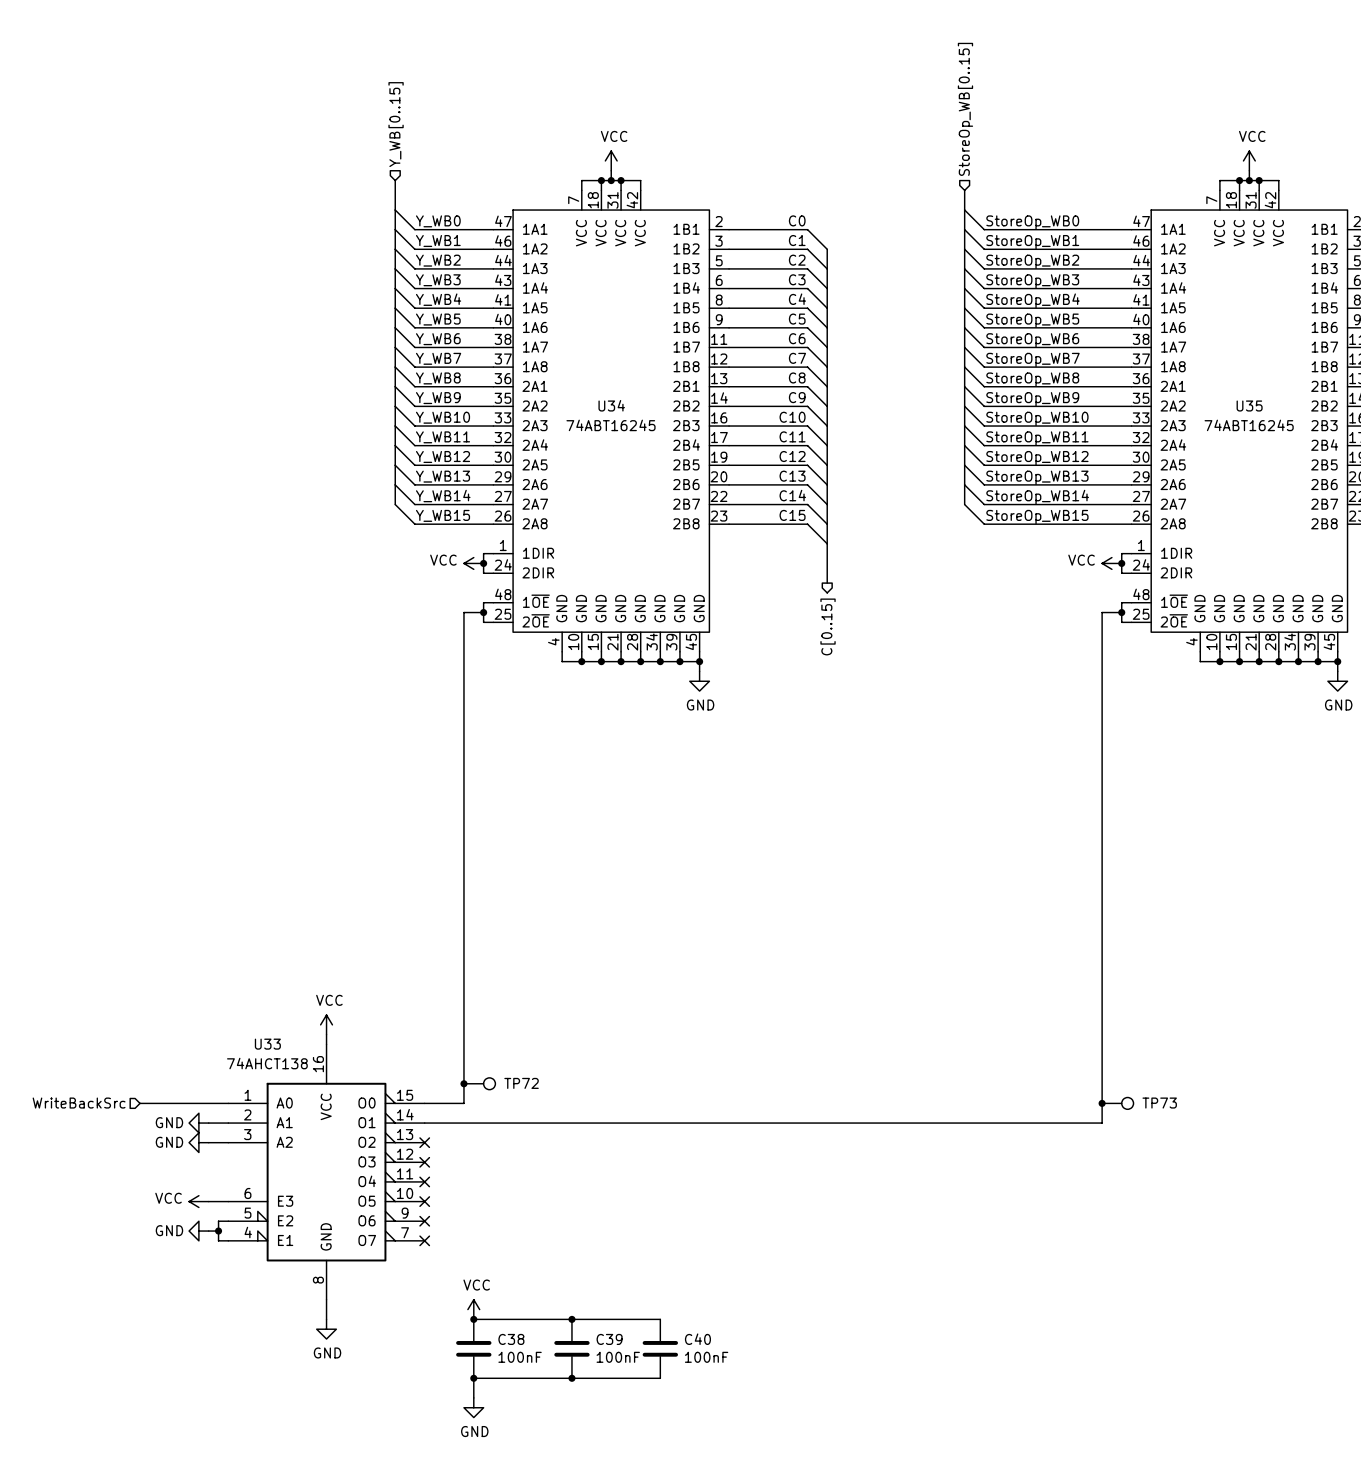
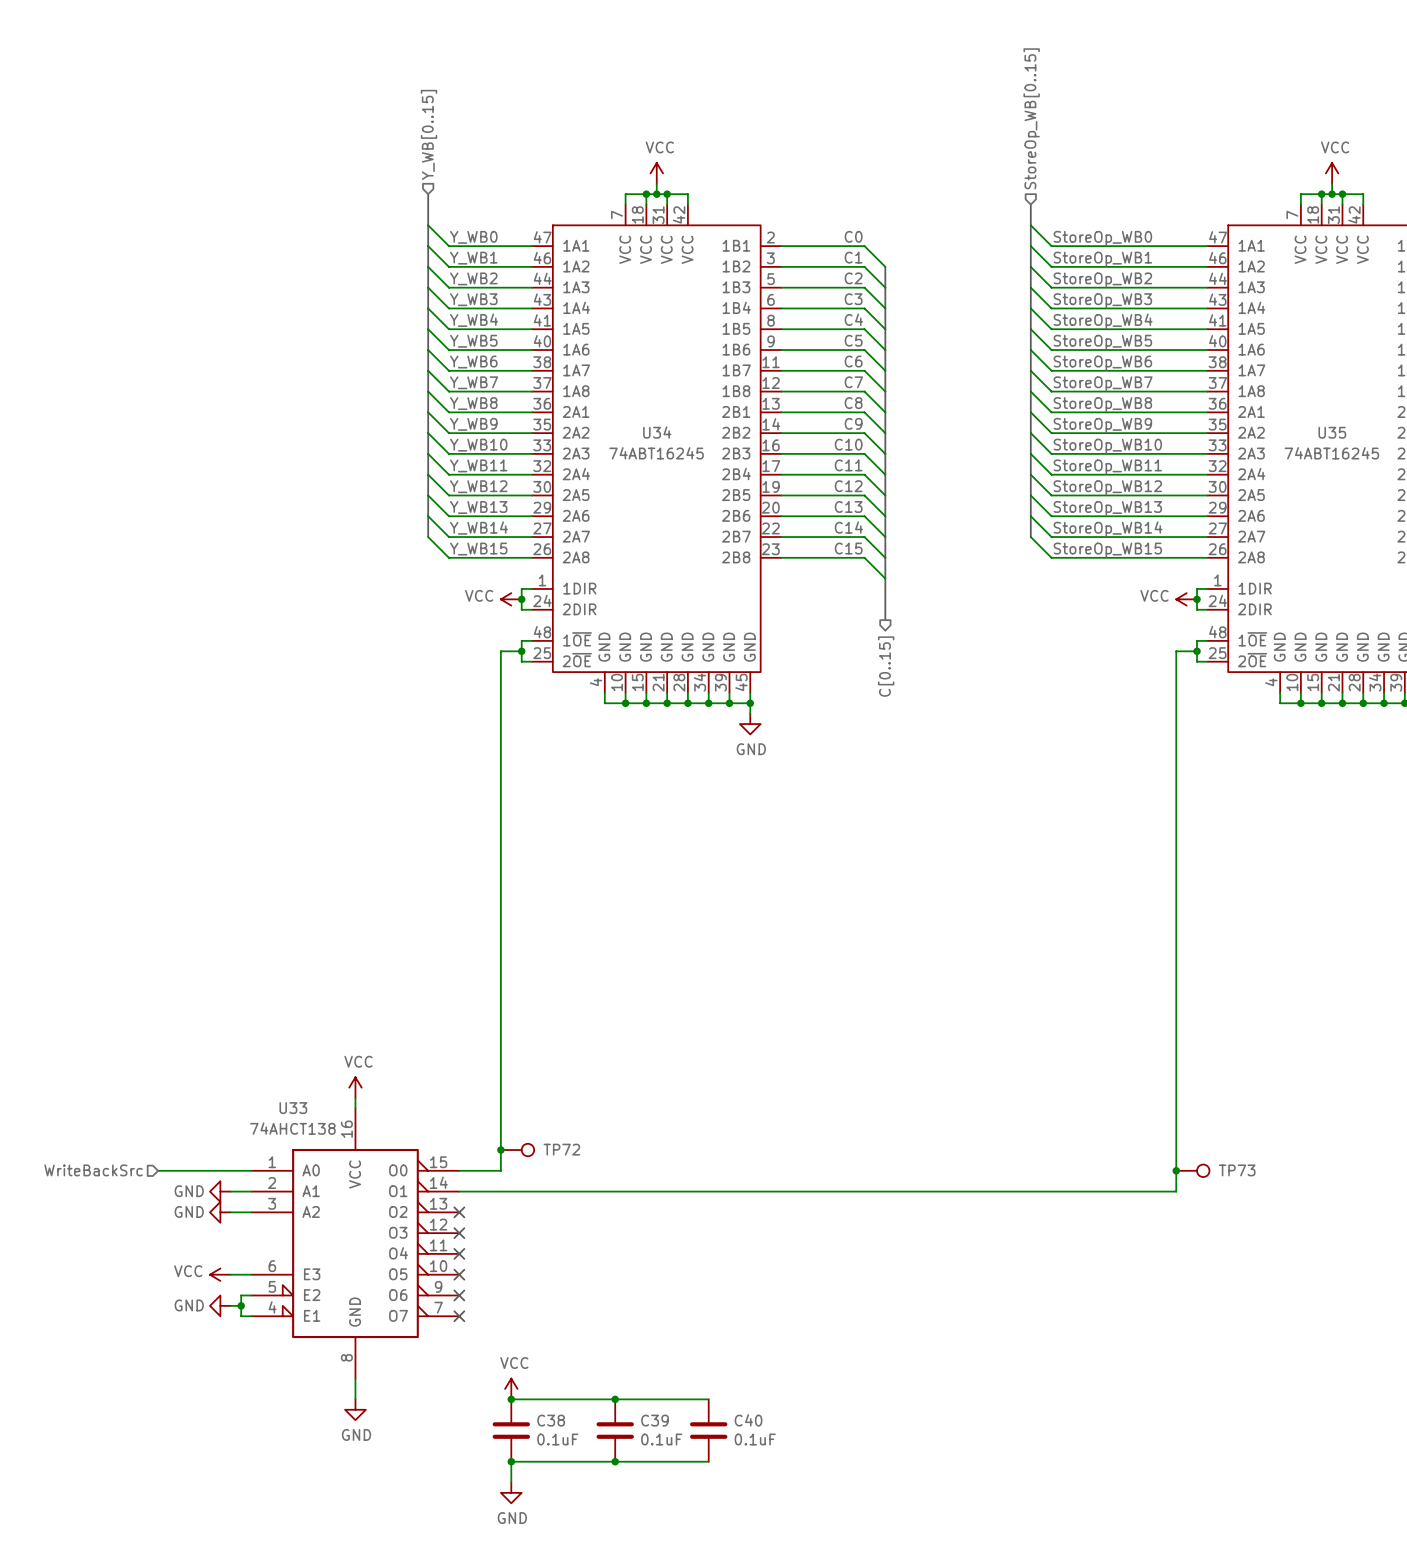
C38 value: 100nF (520, 1357) -> 0.1uF (557, 1439)
C39 value: 100nF (618, 1357) -> 0.1uF (661, 1439)
C40 value: 100nF (706, 1357) -> 0.1uF (755, 1439)

